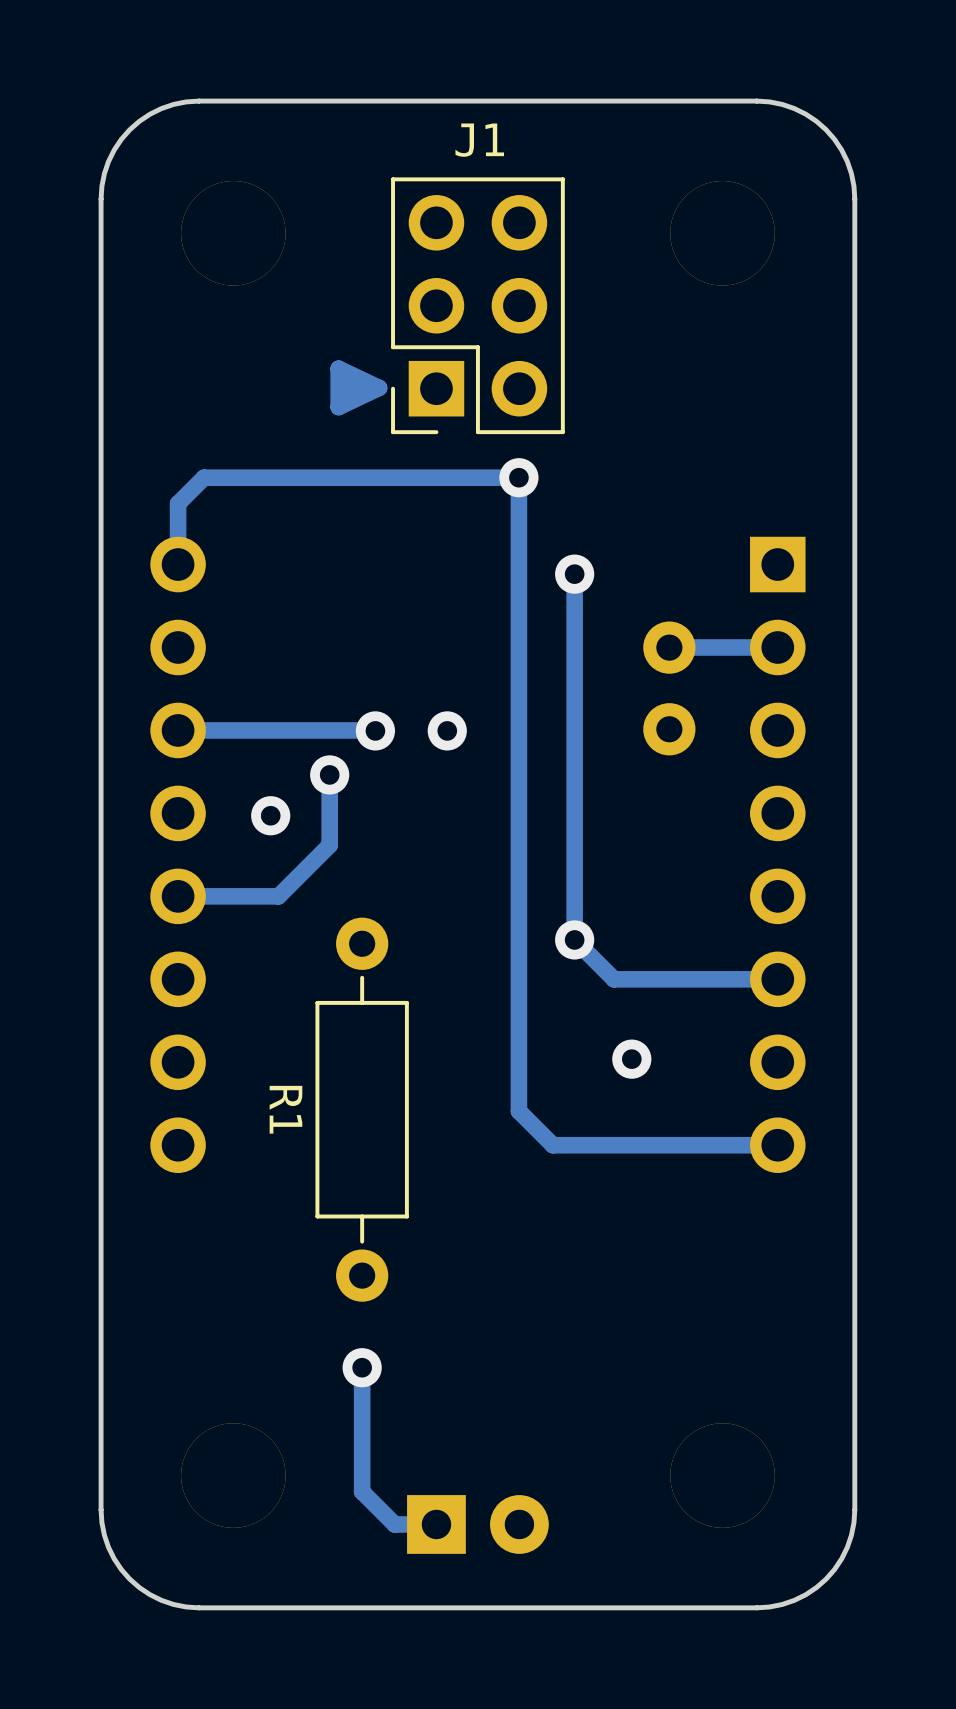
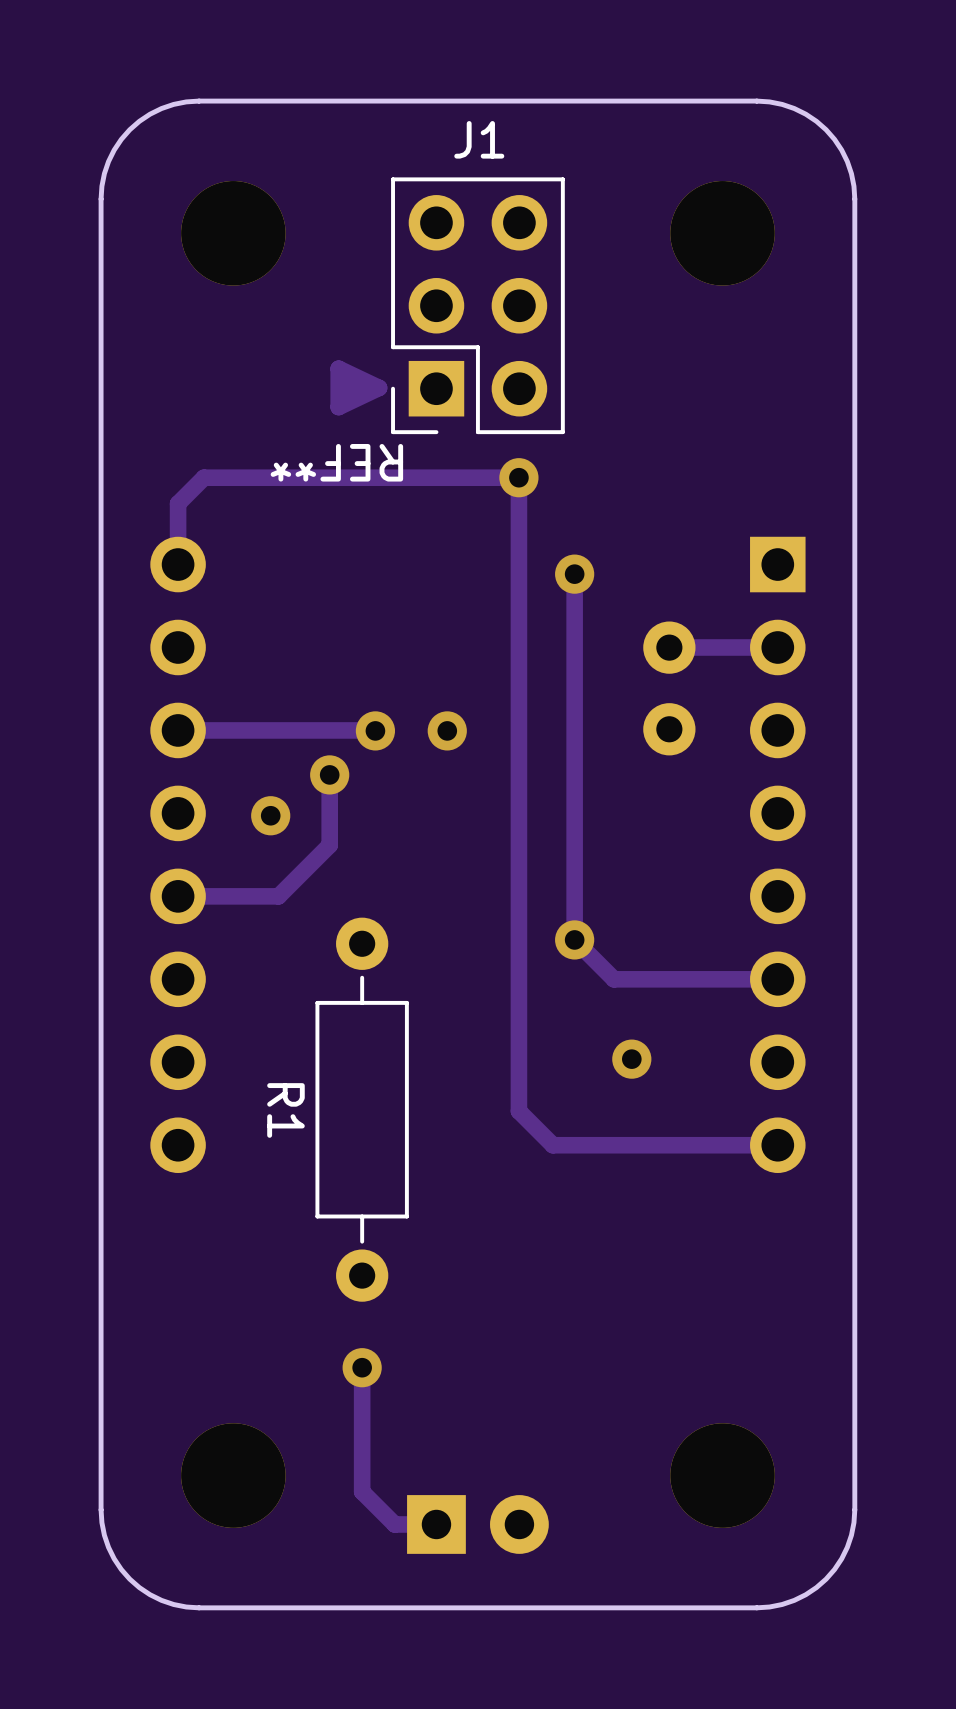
REF**: none -> (358, 387)

